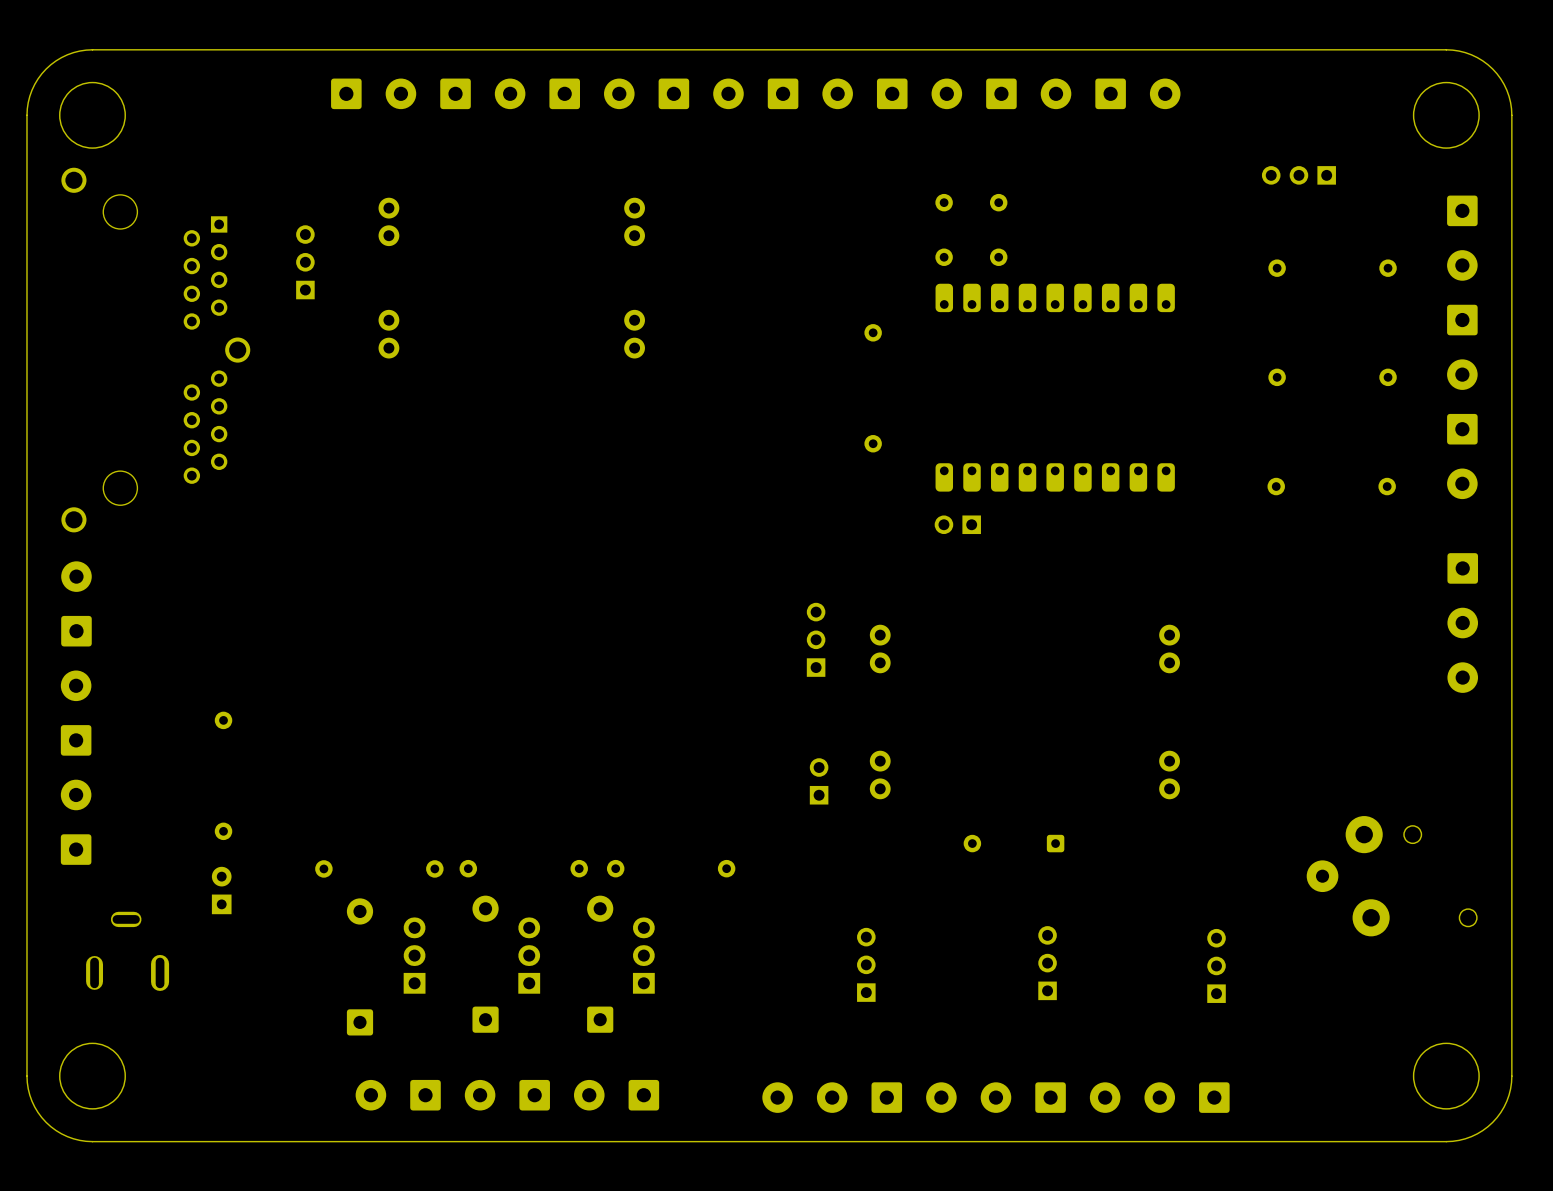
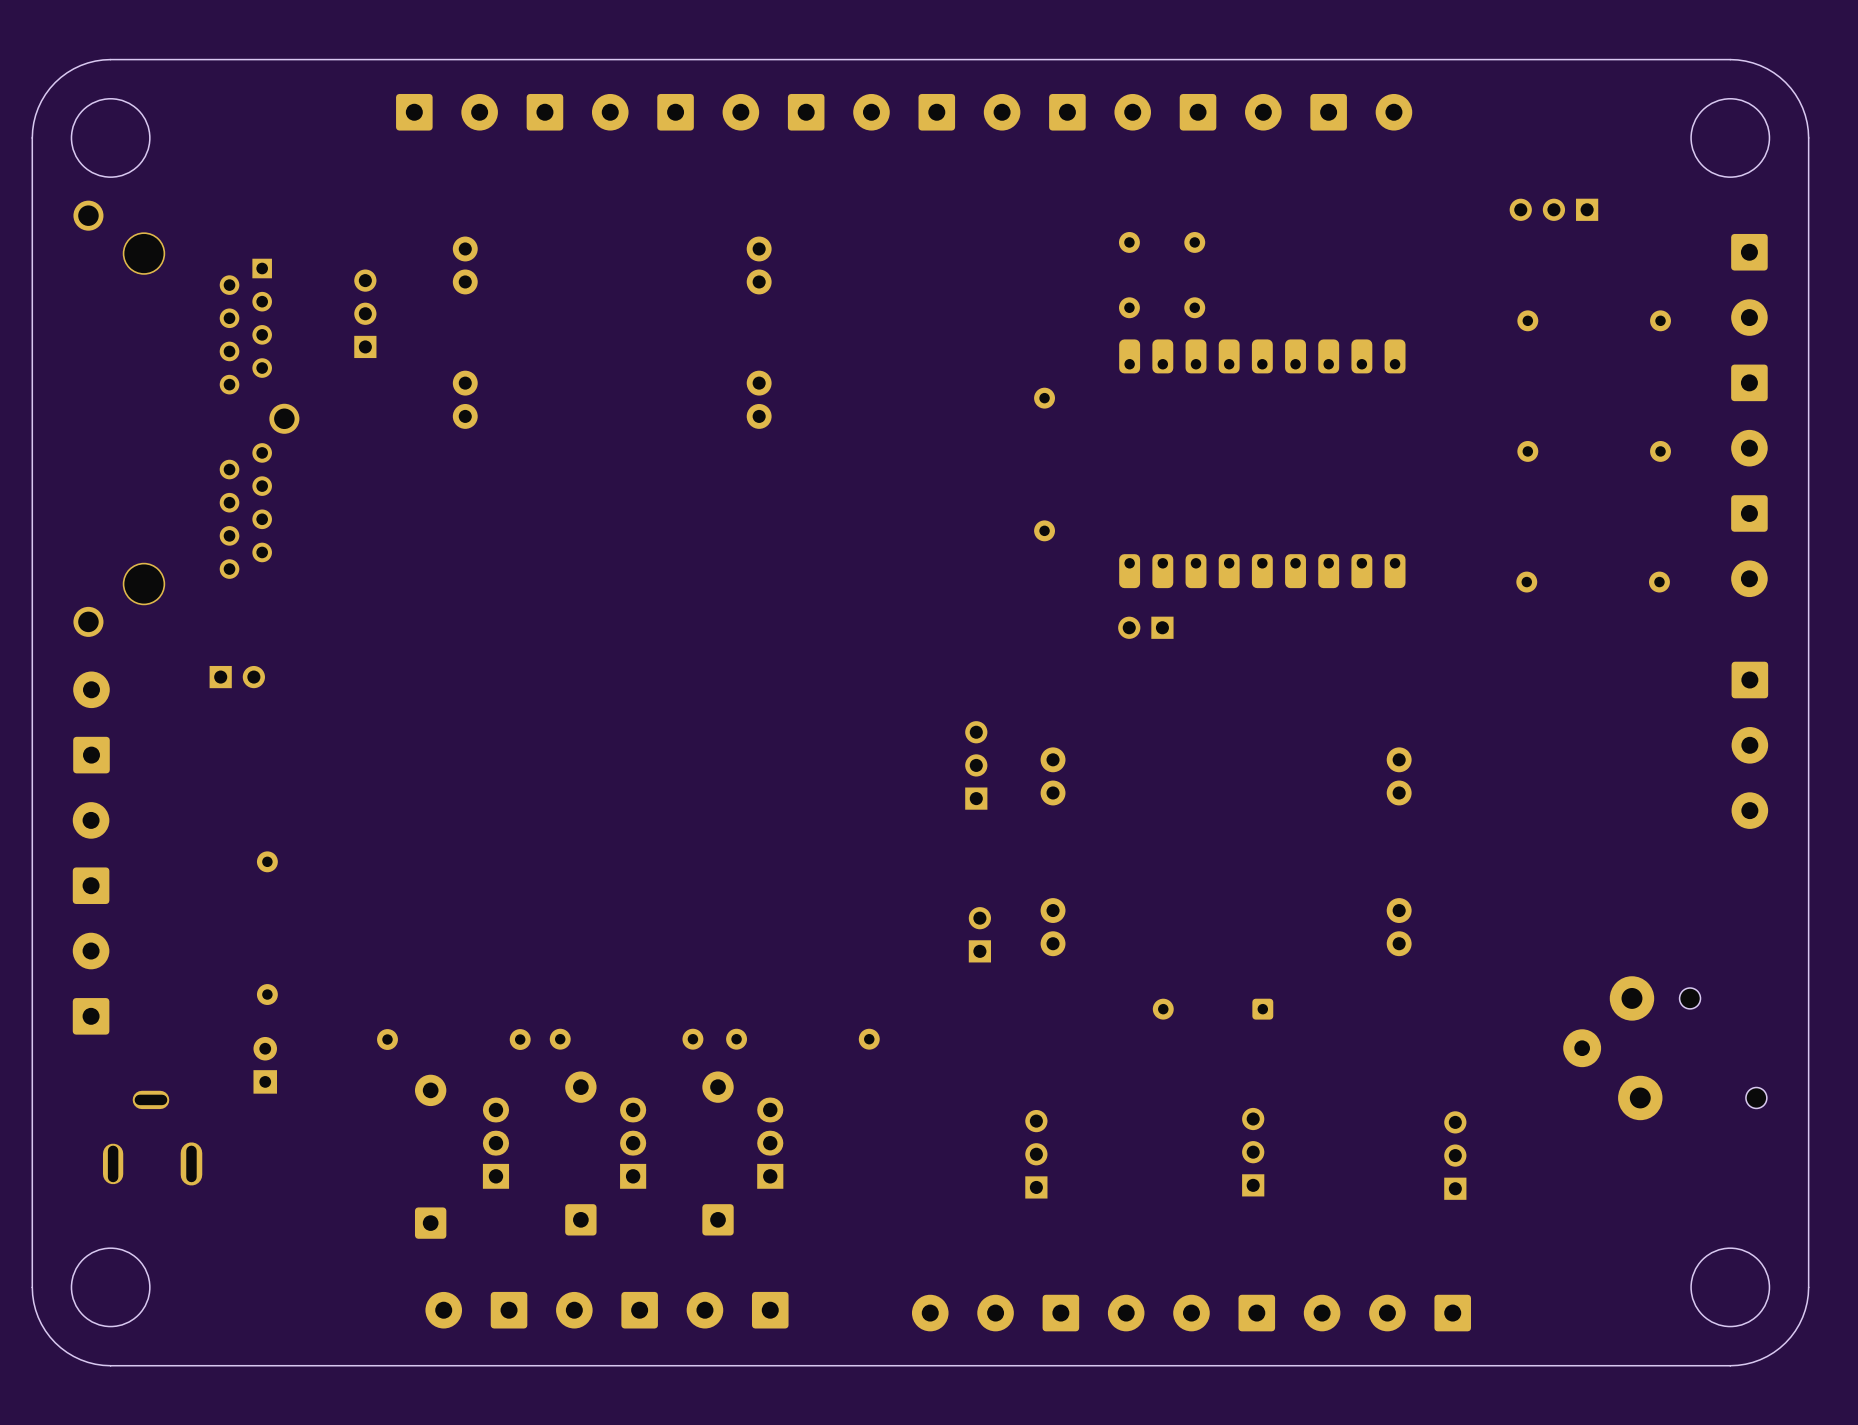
part: none -> (237, 677)

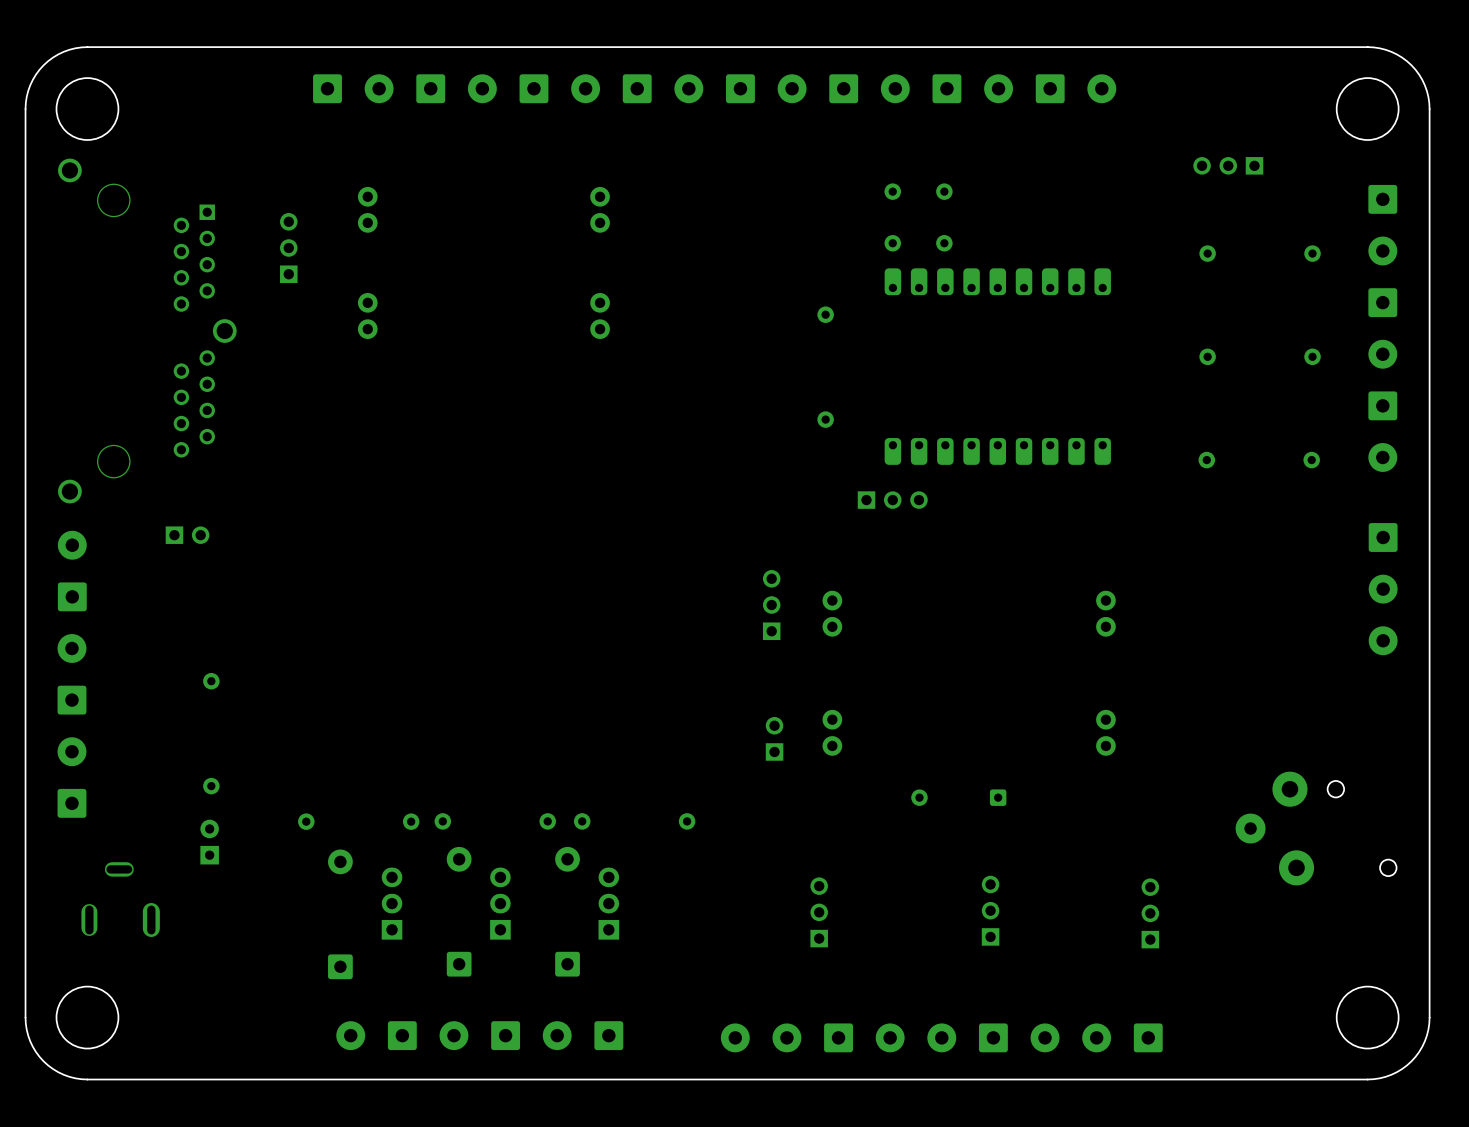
part: (1145, 627) -> none
part: none -> (892, 500)

